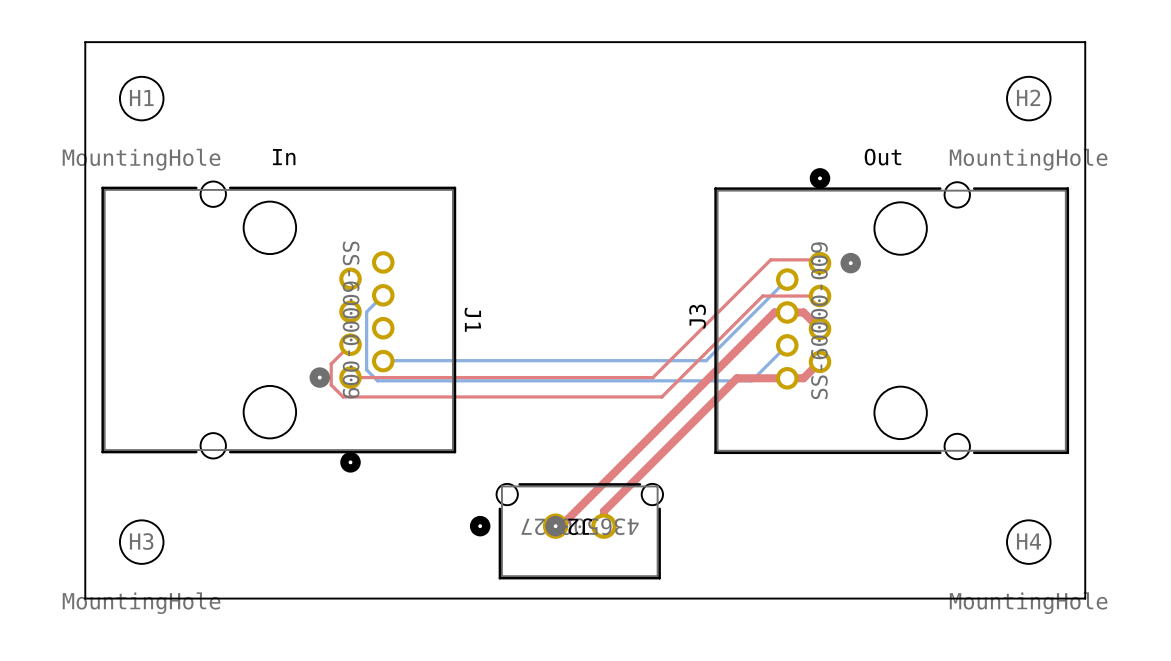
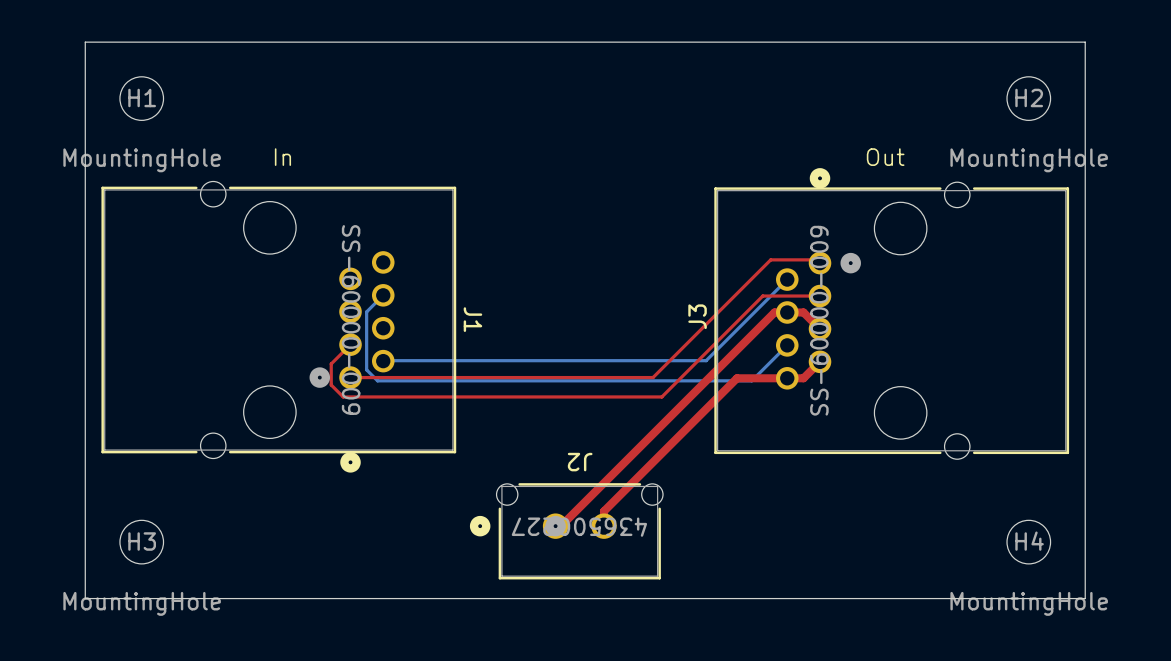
J2 name position: J2 (580, 526) -> J2 (580, 462)

